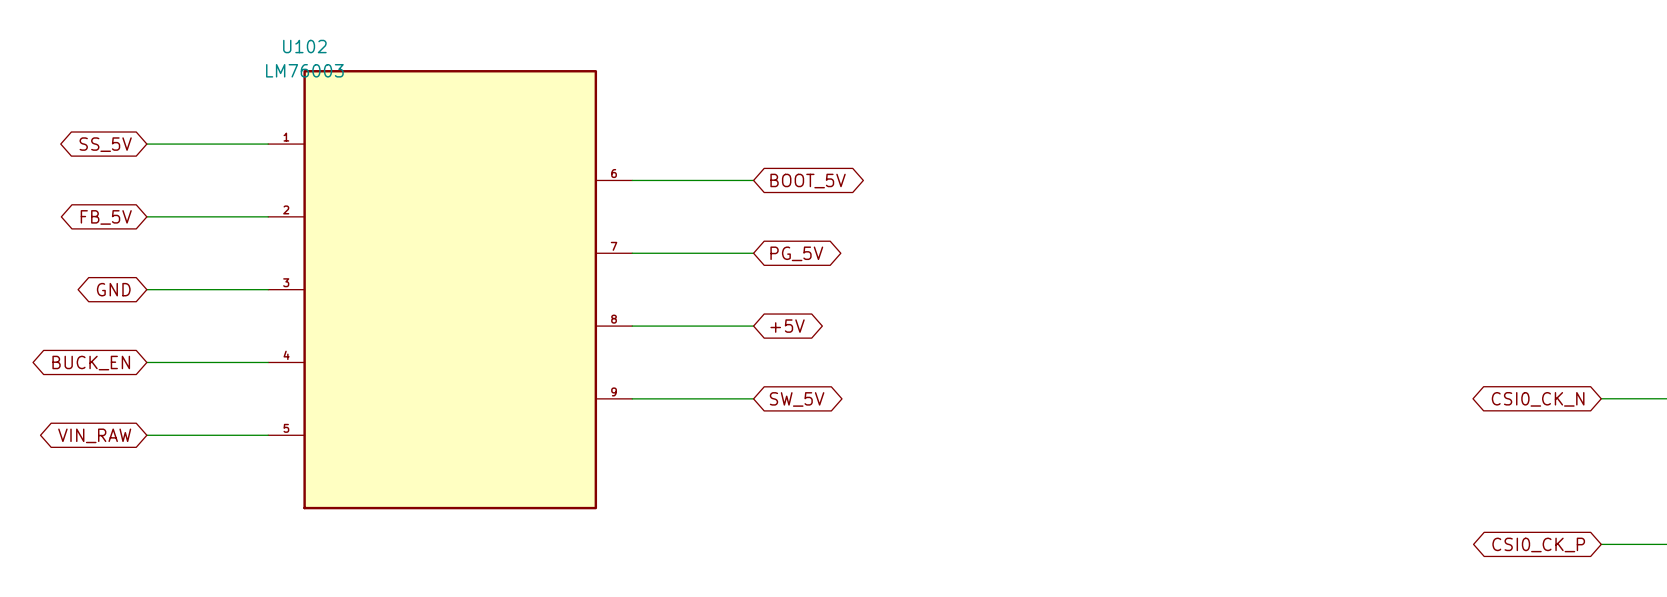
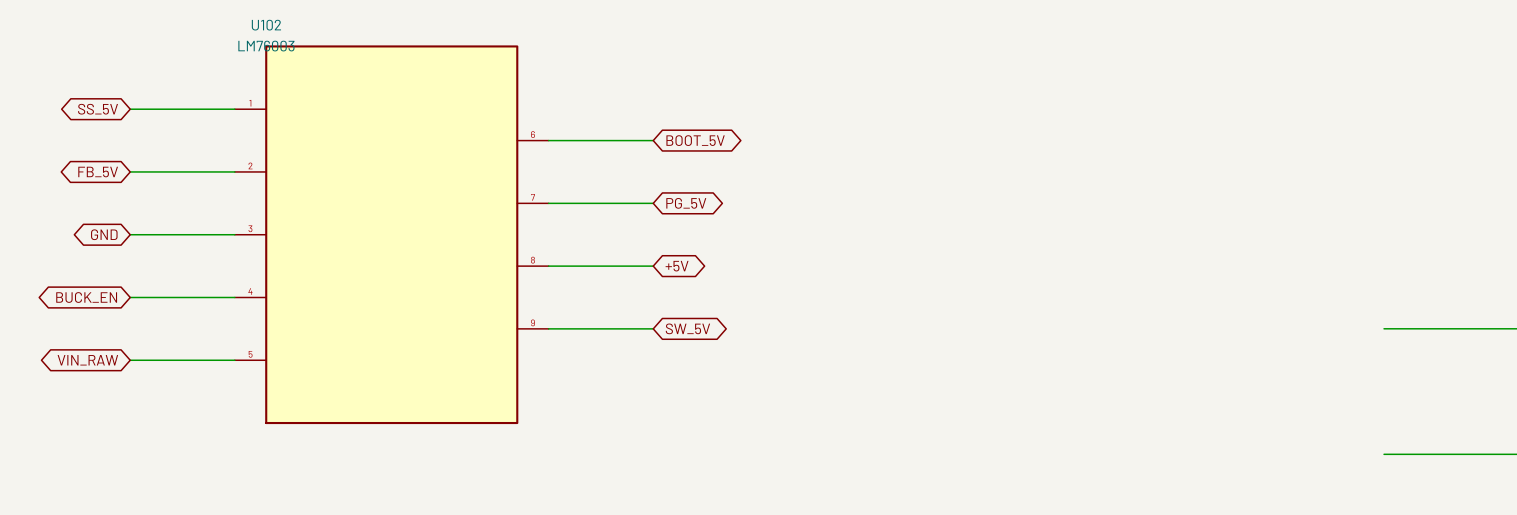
global label: CSI0_CK_N (1538, 399) -> none
global label: CSI0_CK_P (1538, 544) -> none

